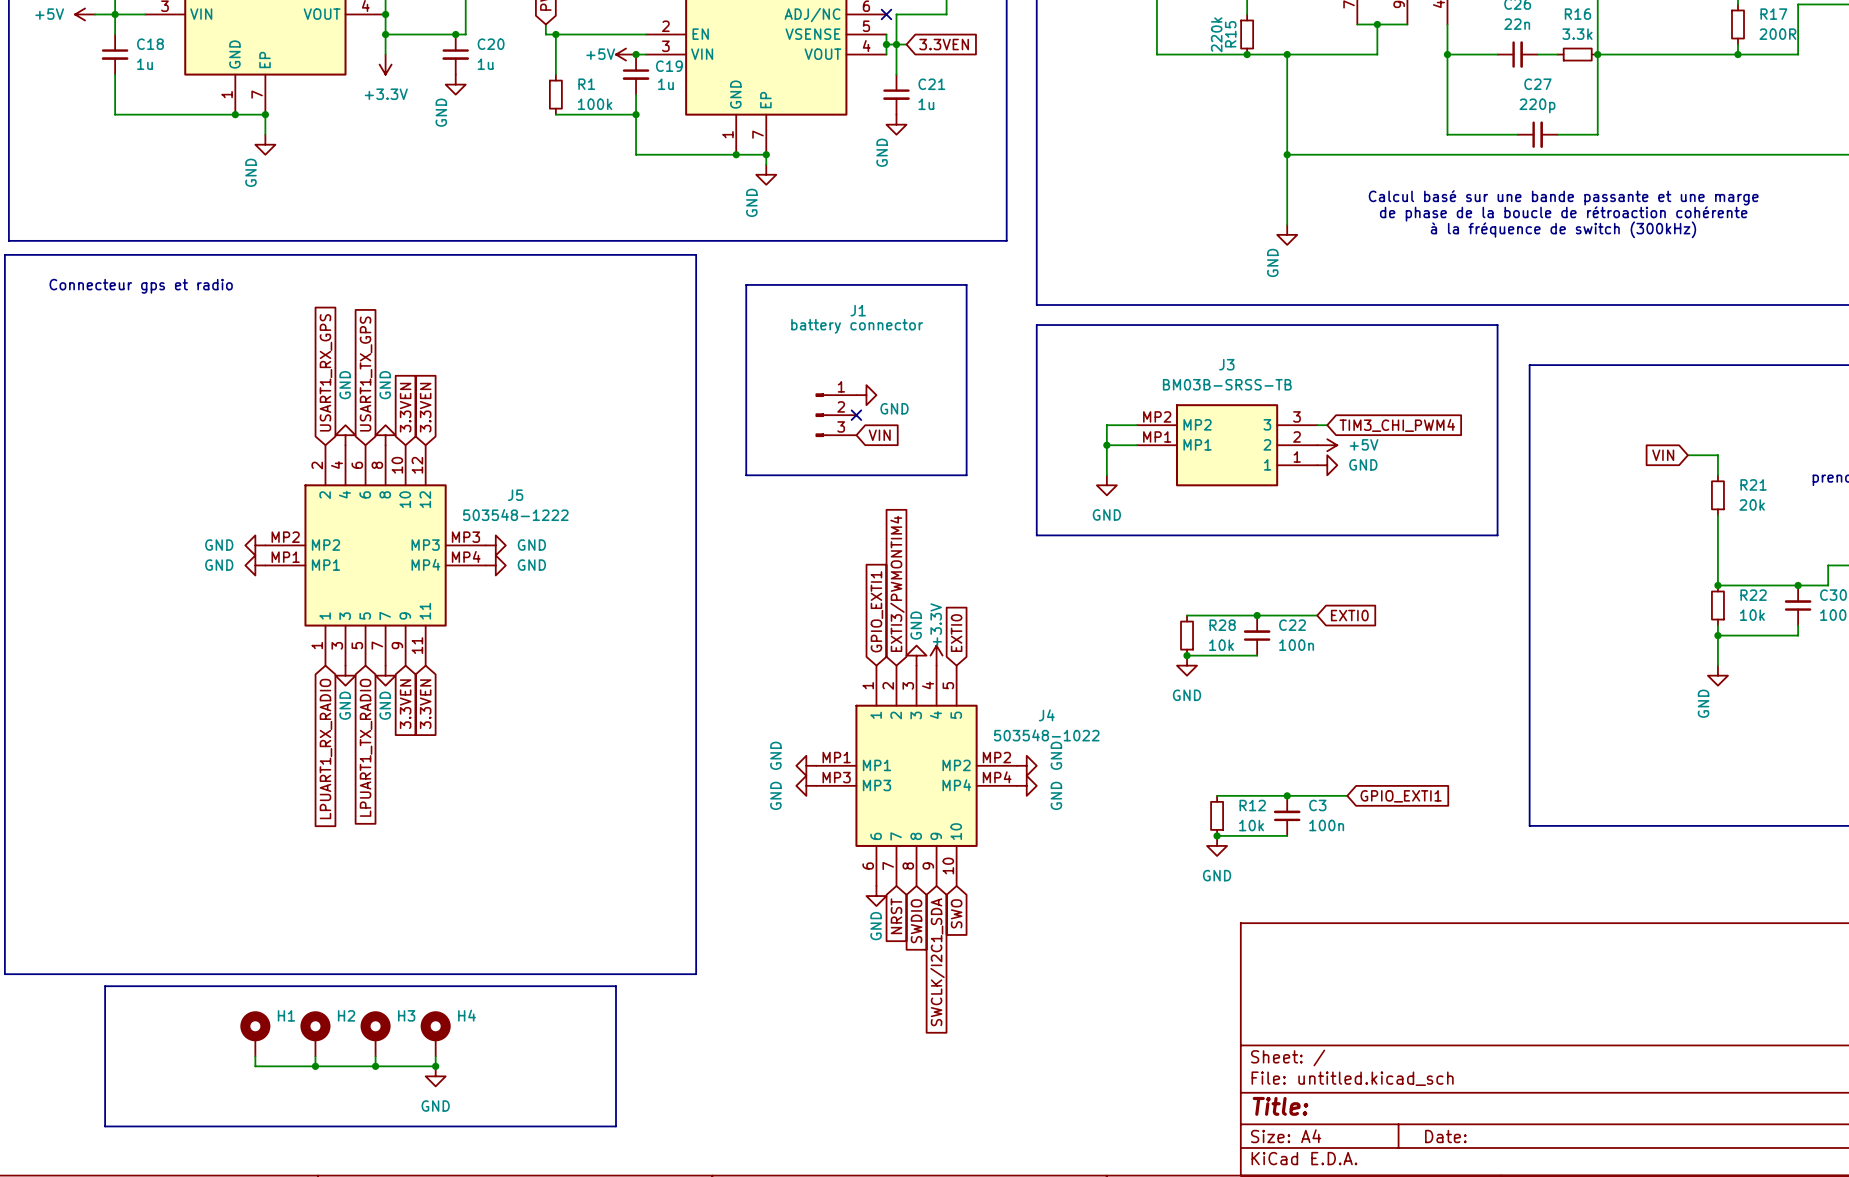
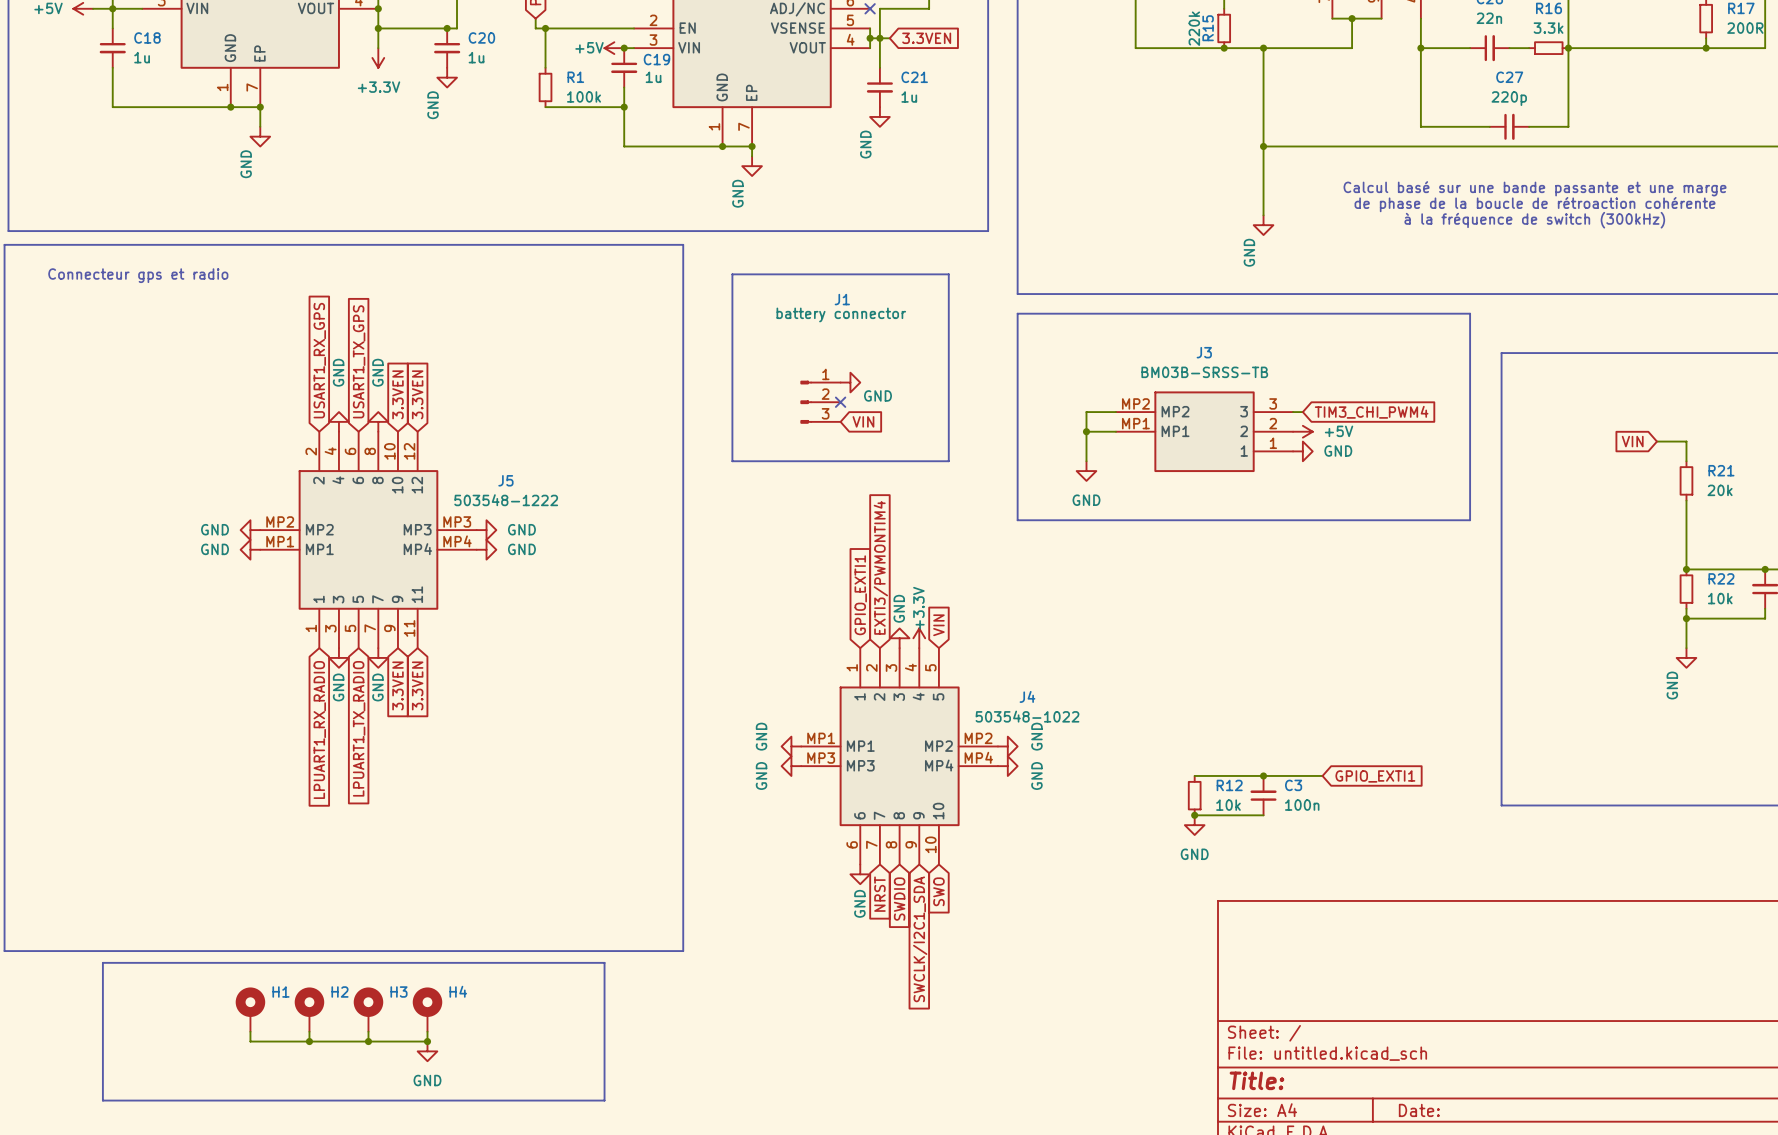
wire: (1187, 615) (1317, 615) -> none
junction: (1257, 615) -> none
global label: EXTI0 (1349, 615) -> none
global label: EXTI0 (956, 633) -> VIN (938, 625)
R28: 10k (1187, 635) -> none
C22: 100n (1257, 635) -> none
wire: (1187, 655) (1257, 655) -> none
junction: (1187, 655) -> none
power symbol: GND (1187, 665) -> none

